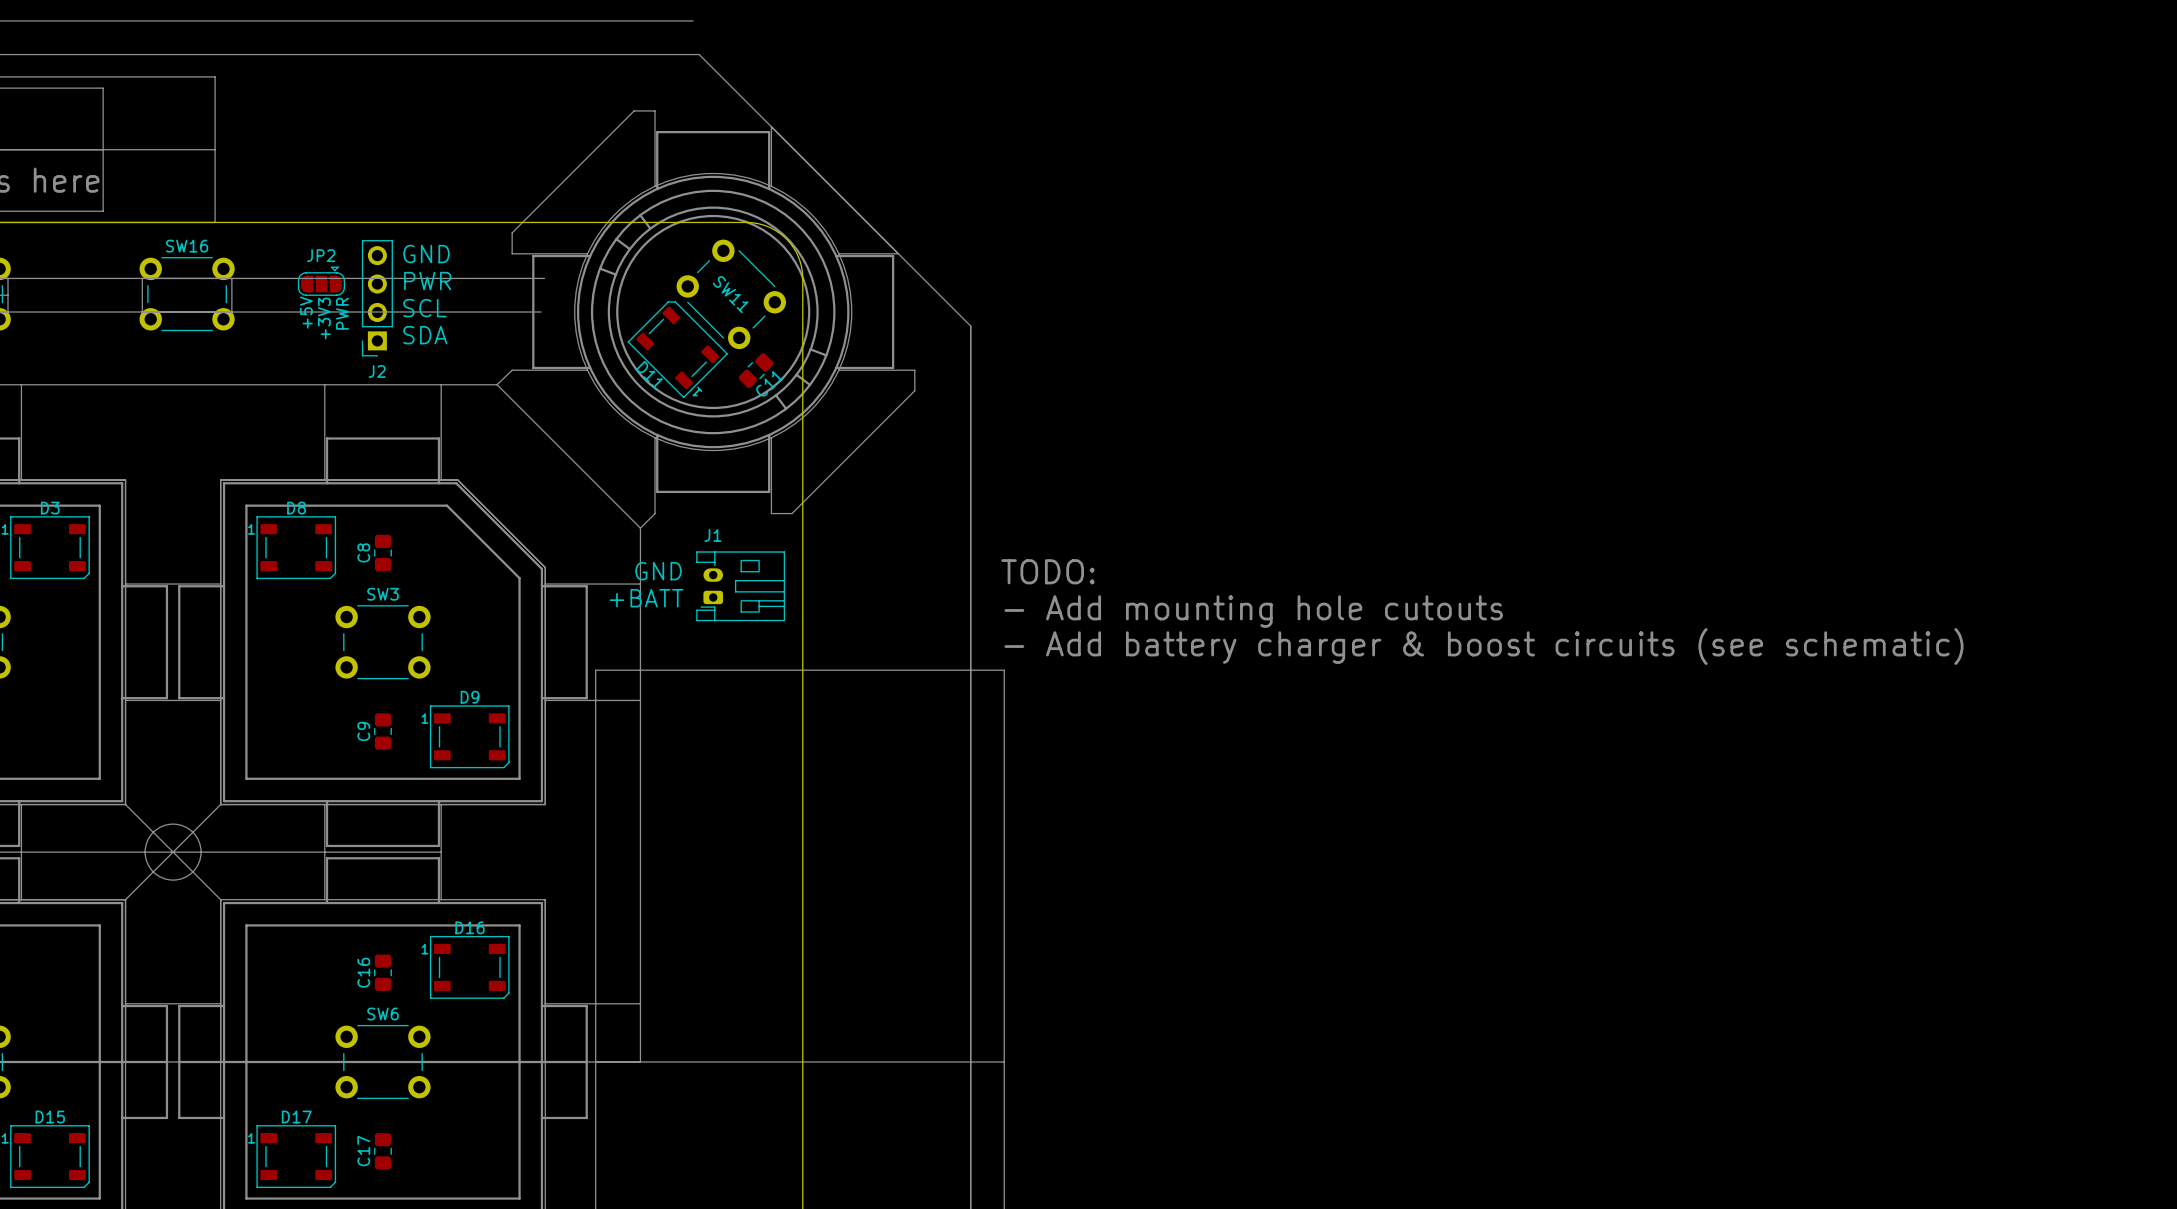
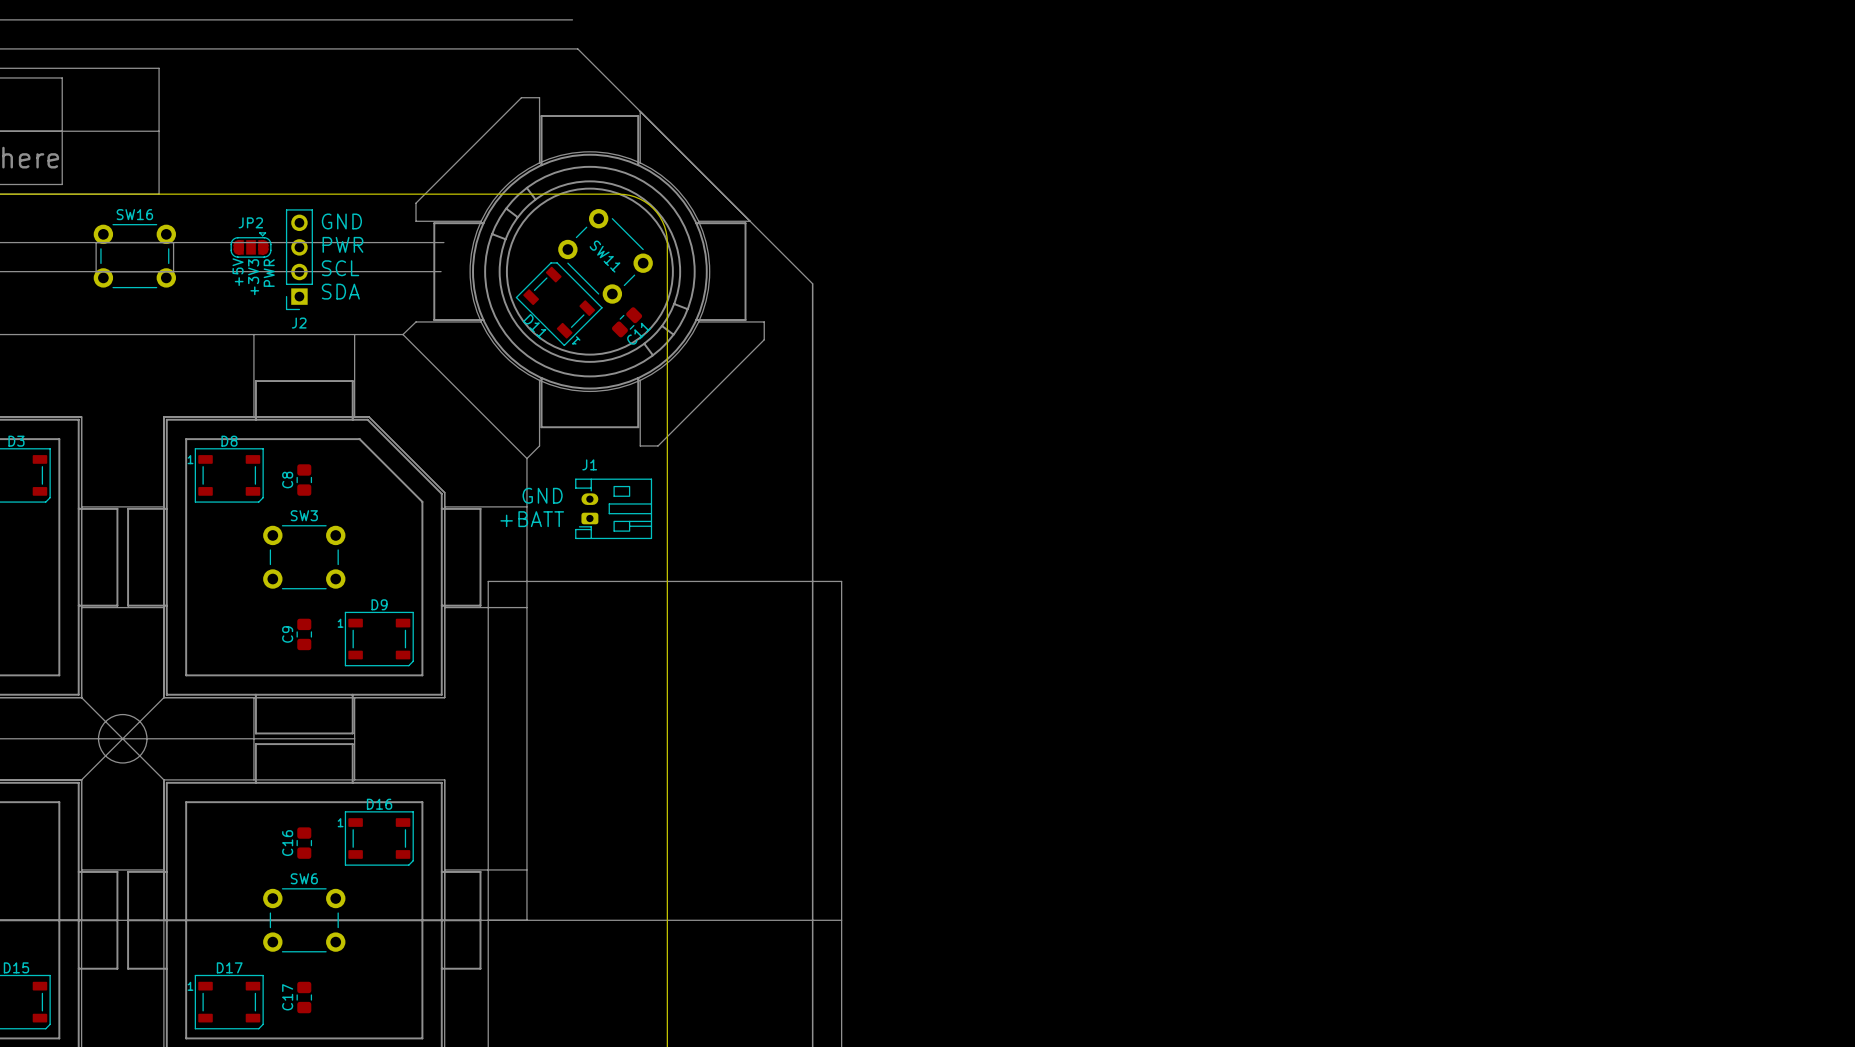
text: TODO: (1047, 571) -> none
text: - Add mounting hole cutouts (1253, 611) -> none
text: - Add battery charger & boost circuits (see schematic) (1483, 646) -> none

